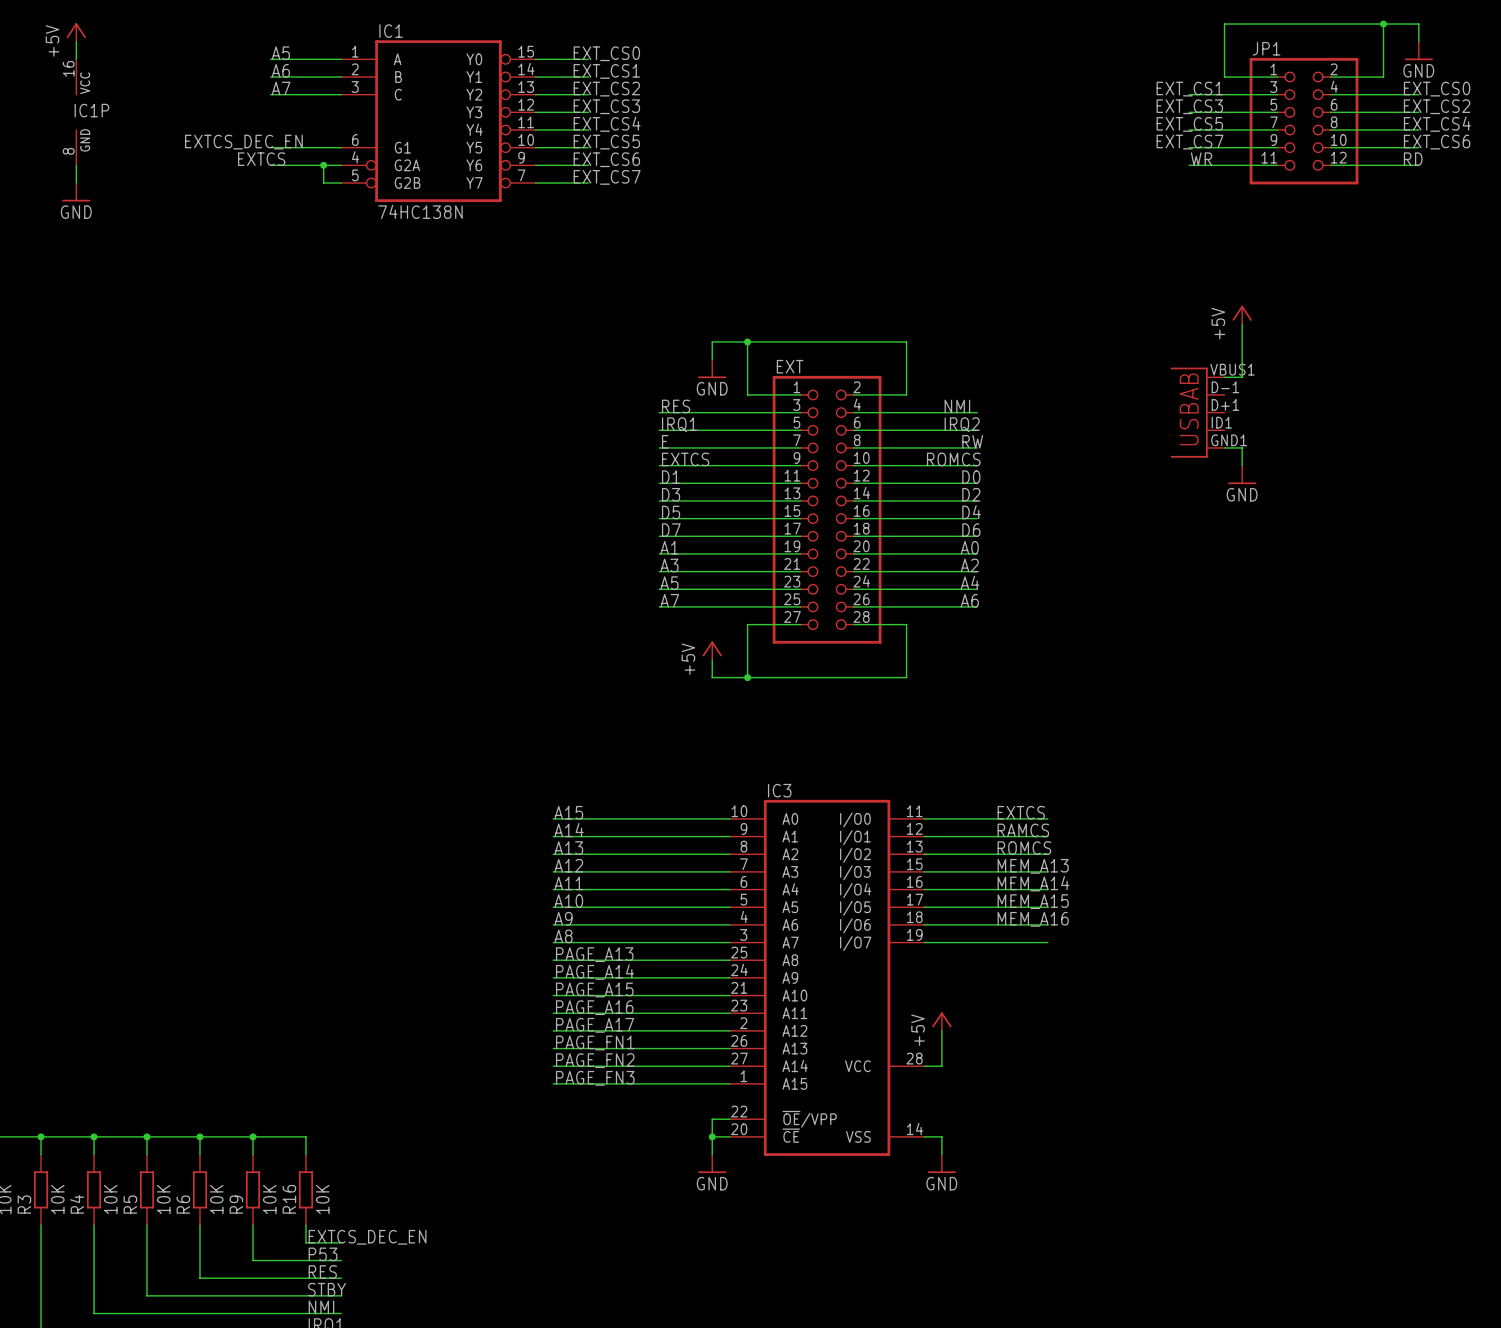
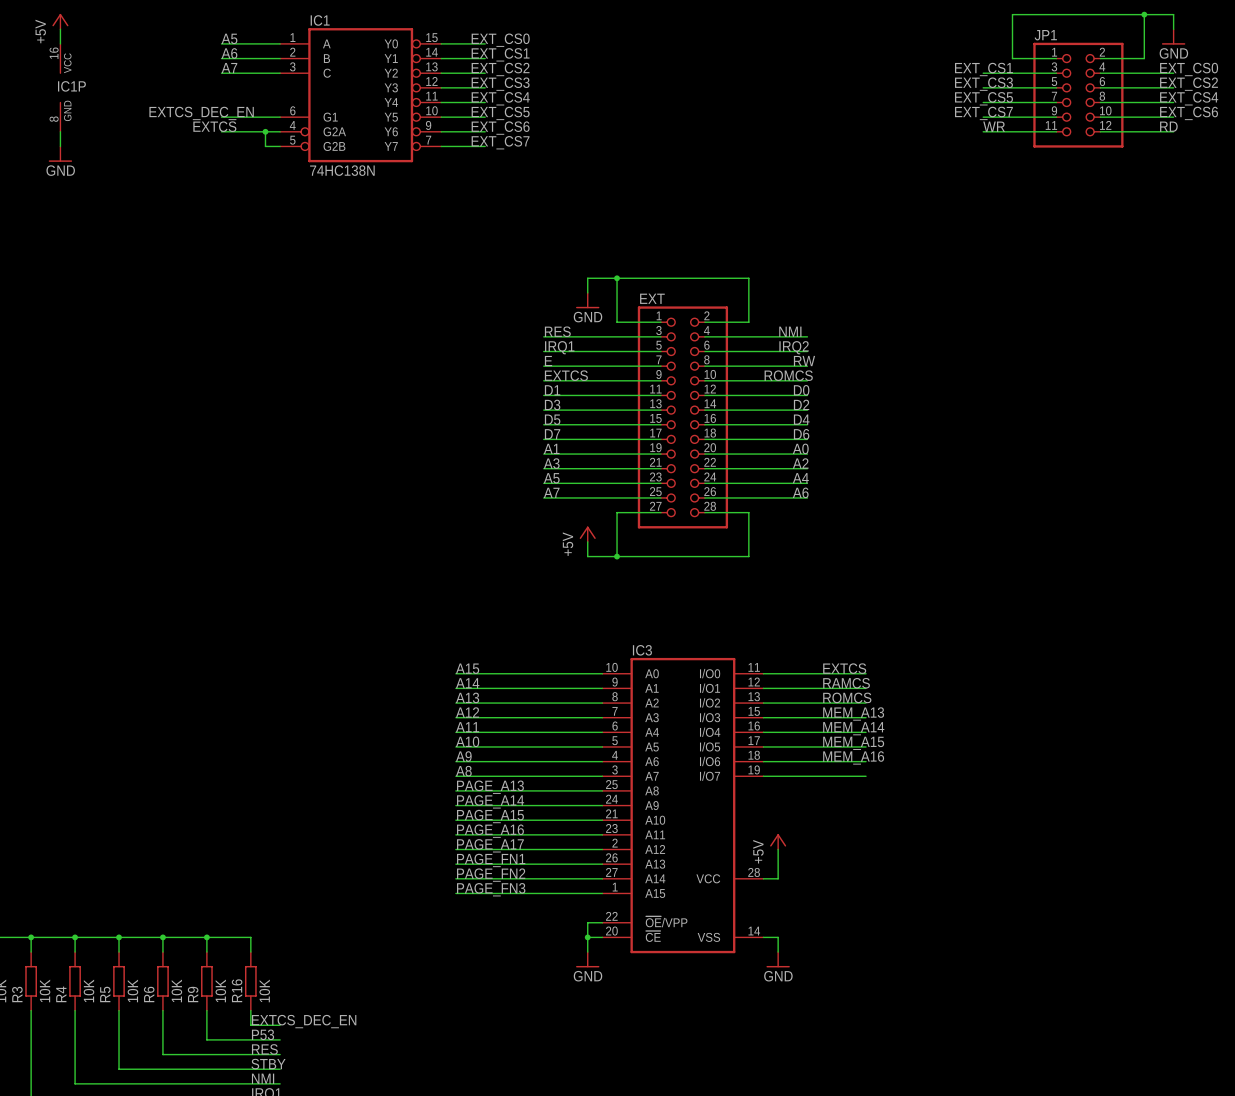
power symbol: +5V (1242, 315) -> none
wire: (1242, 324) (1242, 377) (1224, 377) -> none
part: (1197, 412) -> none
wire: (1224, 447) (1242, 447) (1242, 465) -> none
power symbol: GND (1242, 474) -> none

